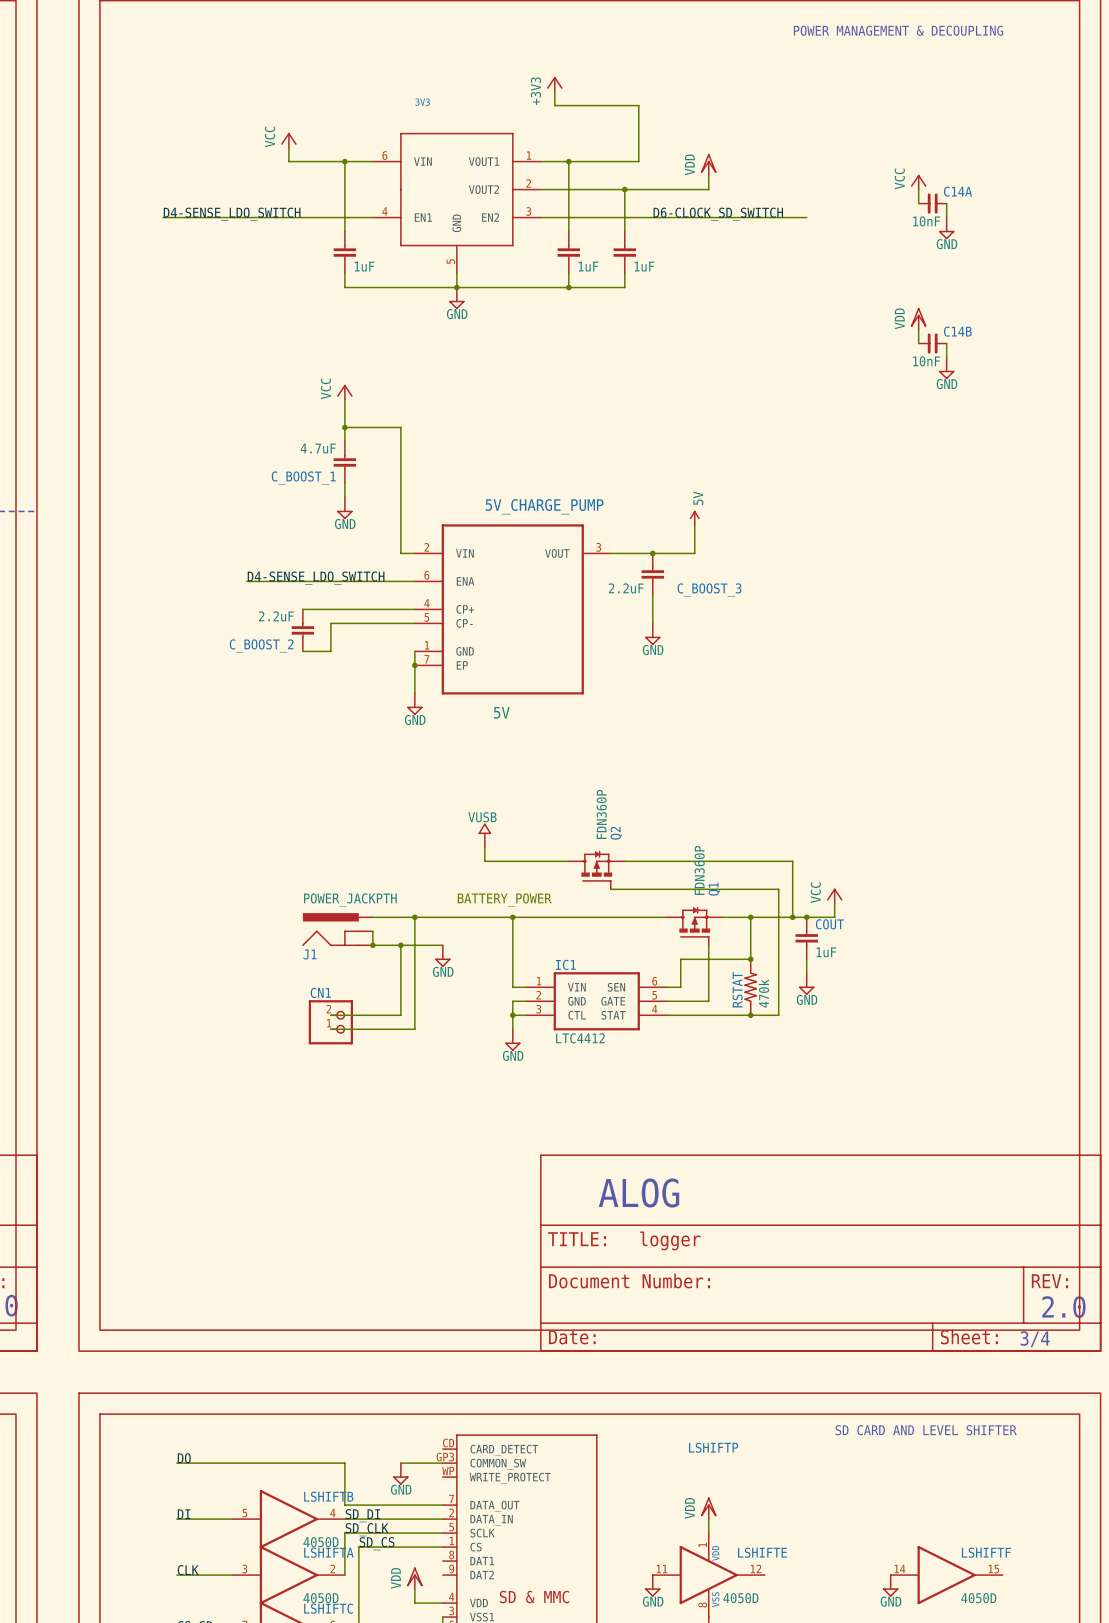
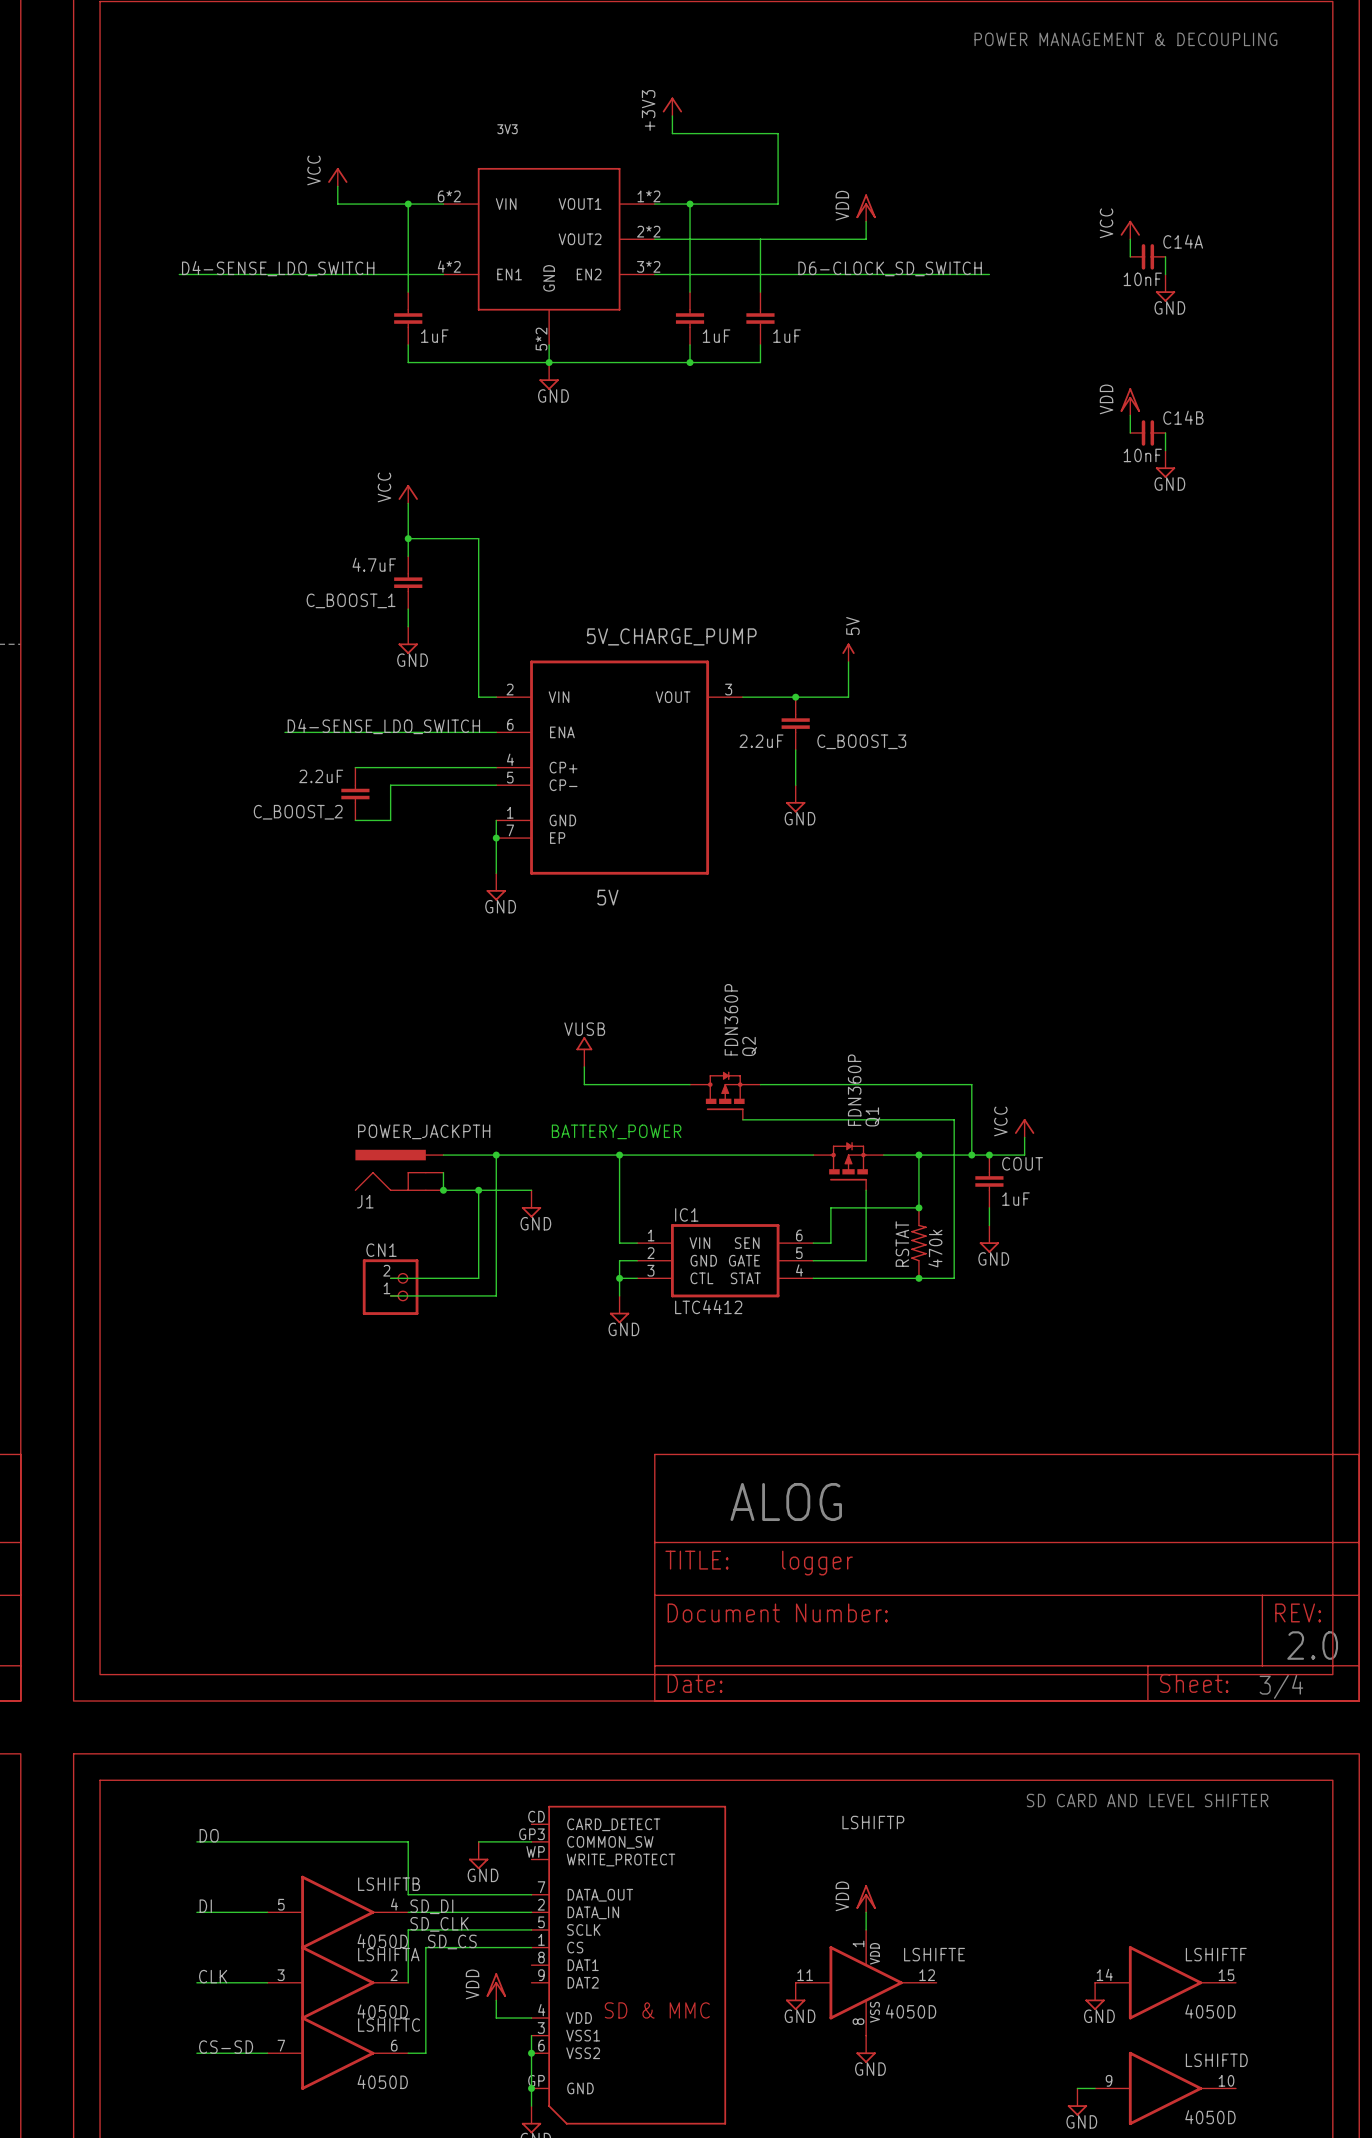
3V3 symbol: [372, 132, 541, 274] -> [443, 167, 655, 345]
junction: (624, 189) -> none

